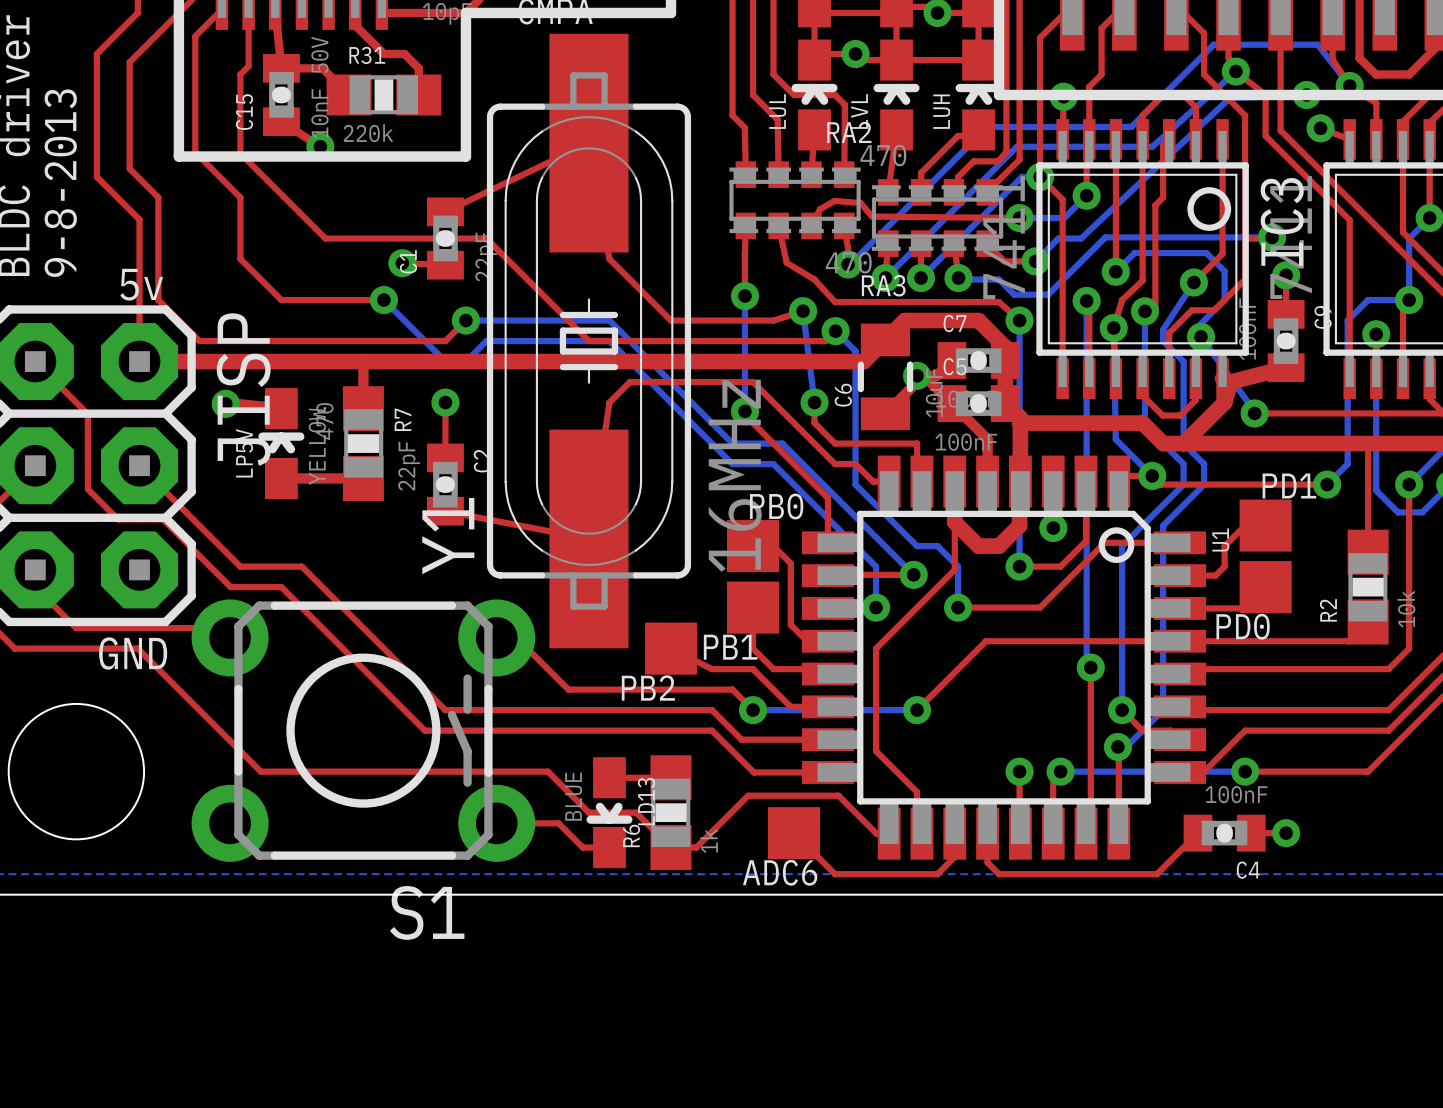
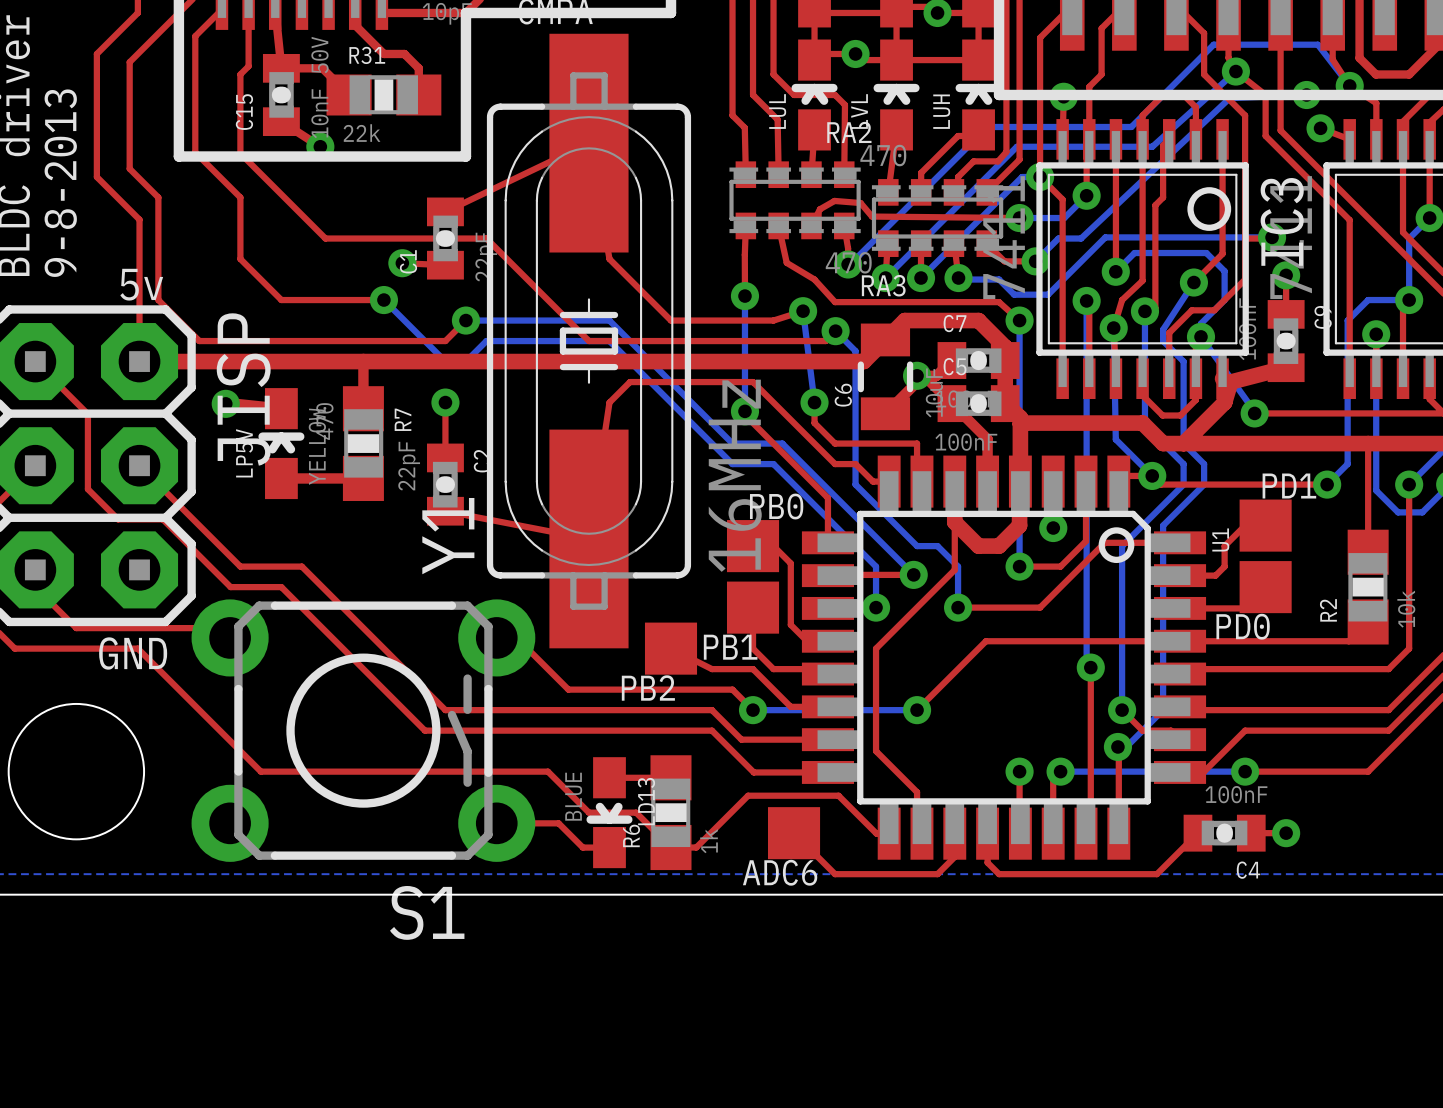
R31 value: 220k (368, 133) -> 22k (362, 133)

